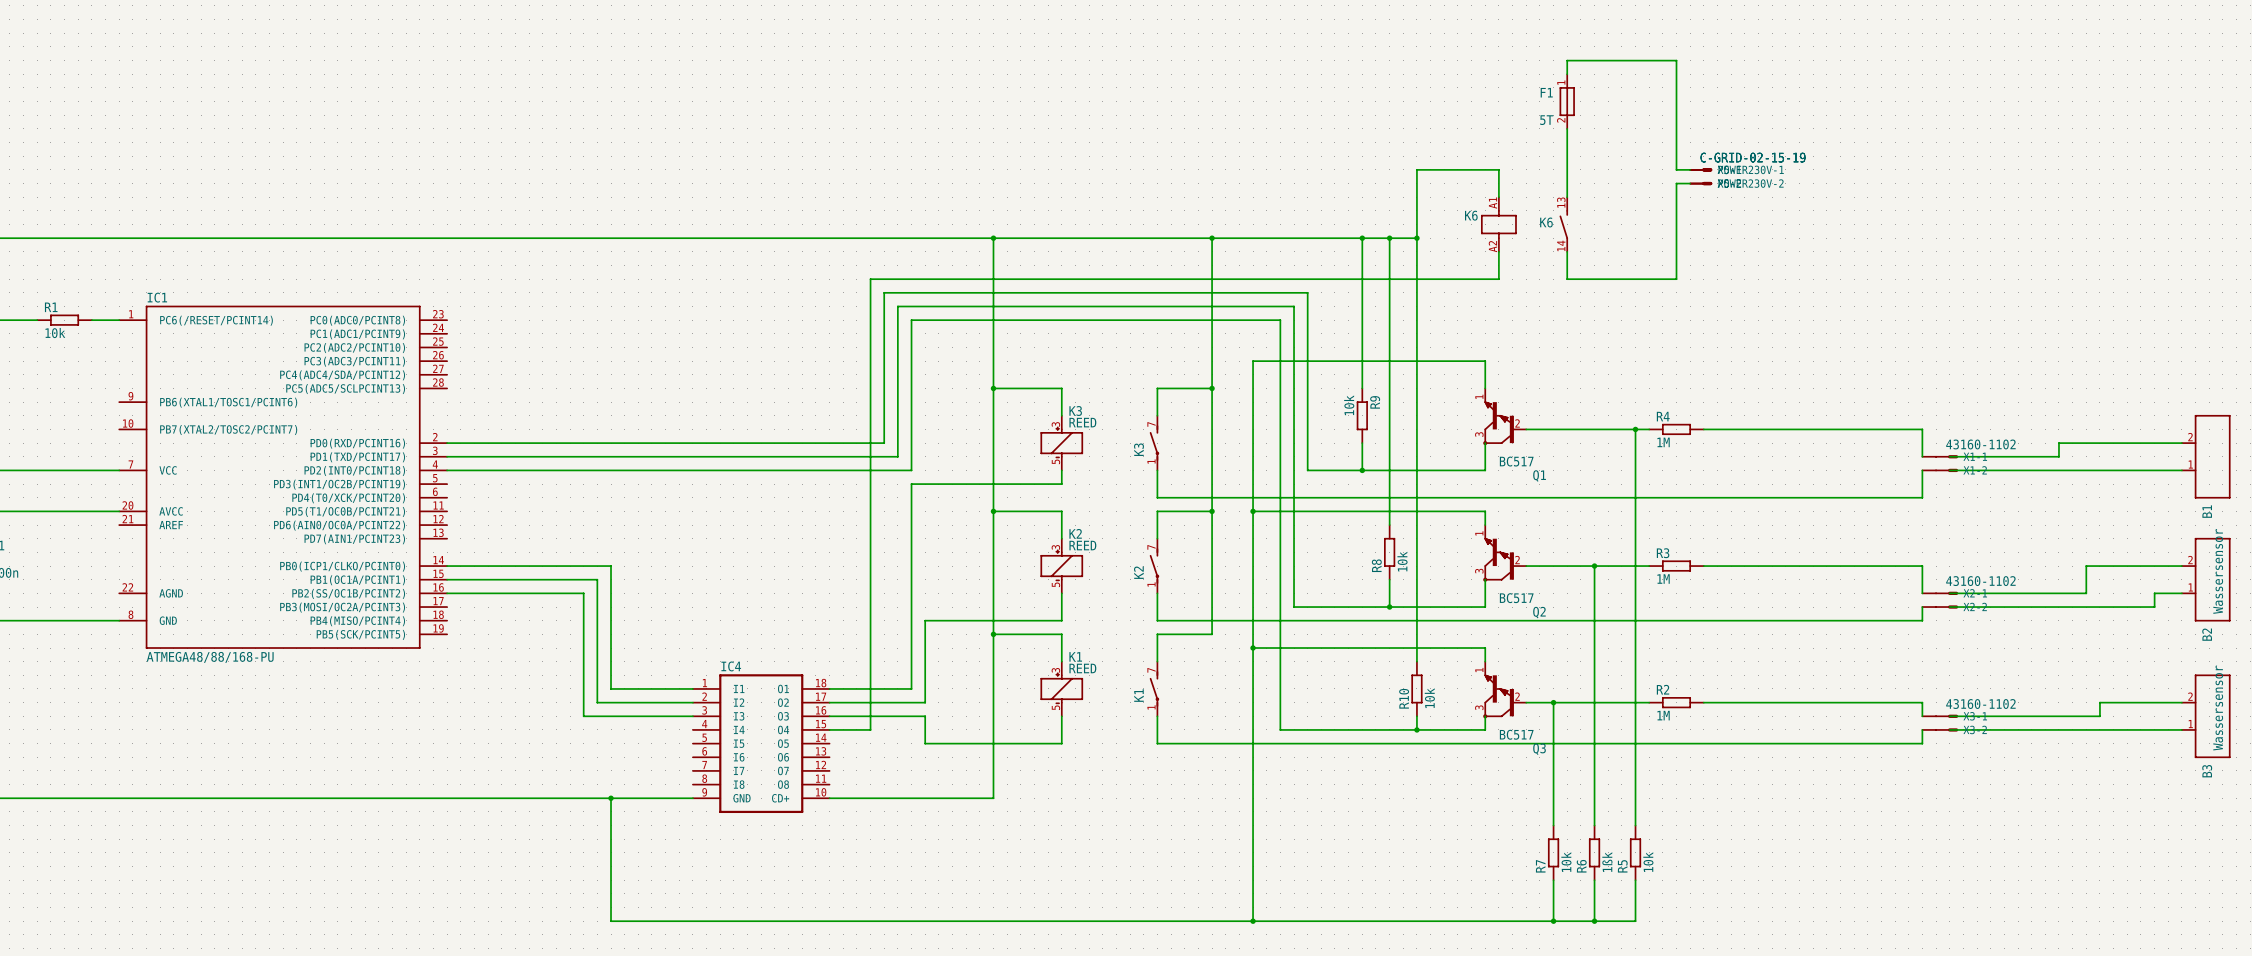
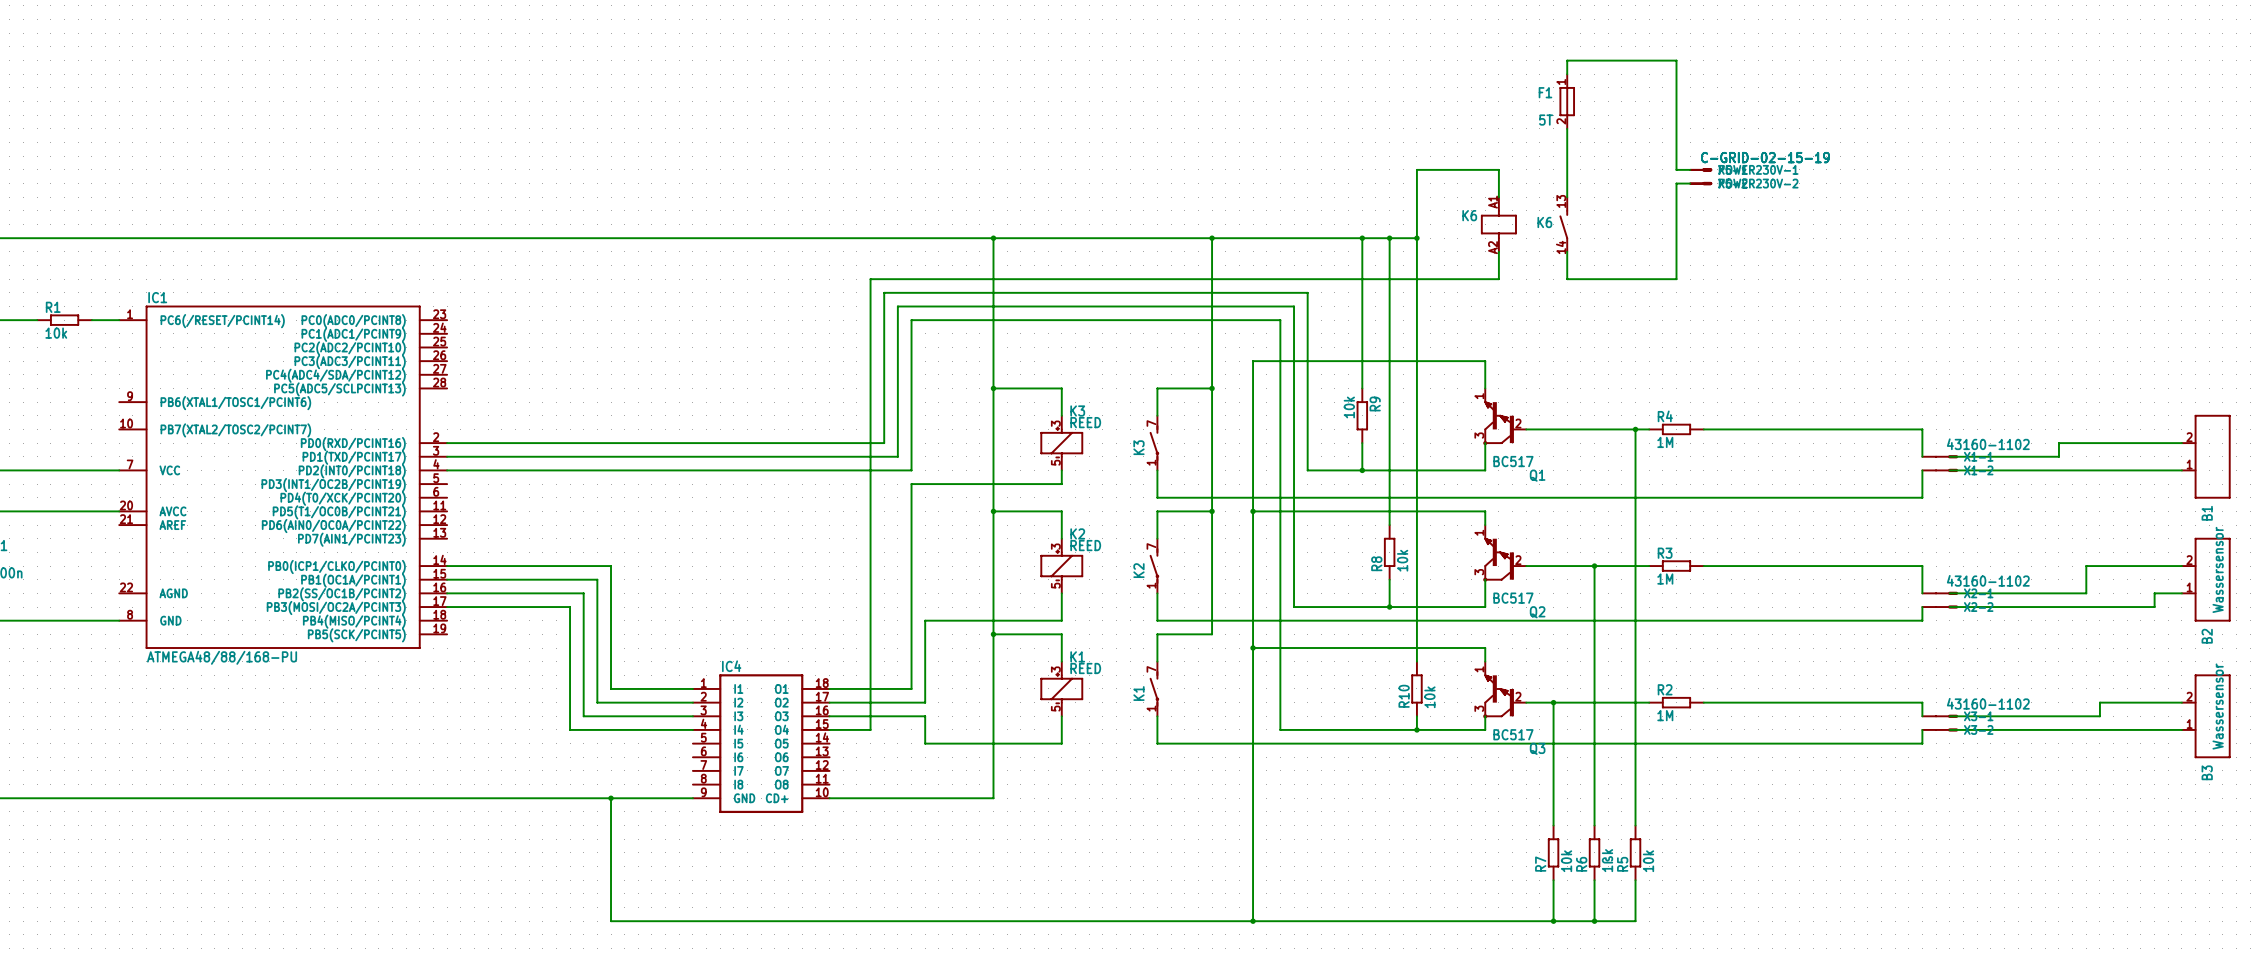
wire: none -> (447, 607) (570, 607) (570, 729) (692, 729)

